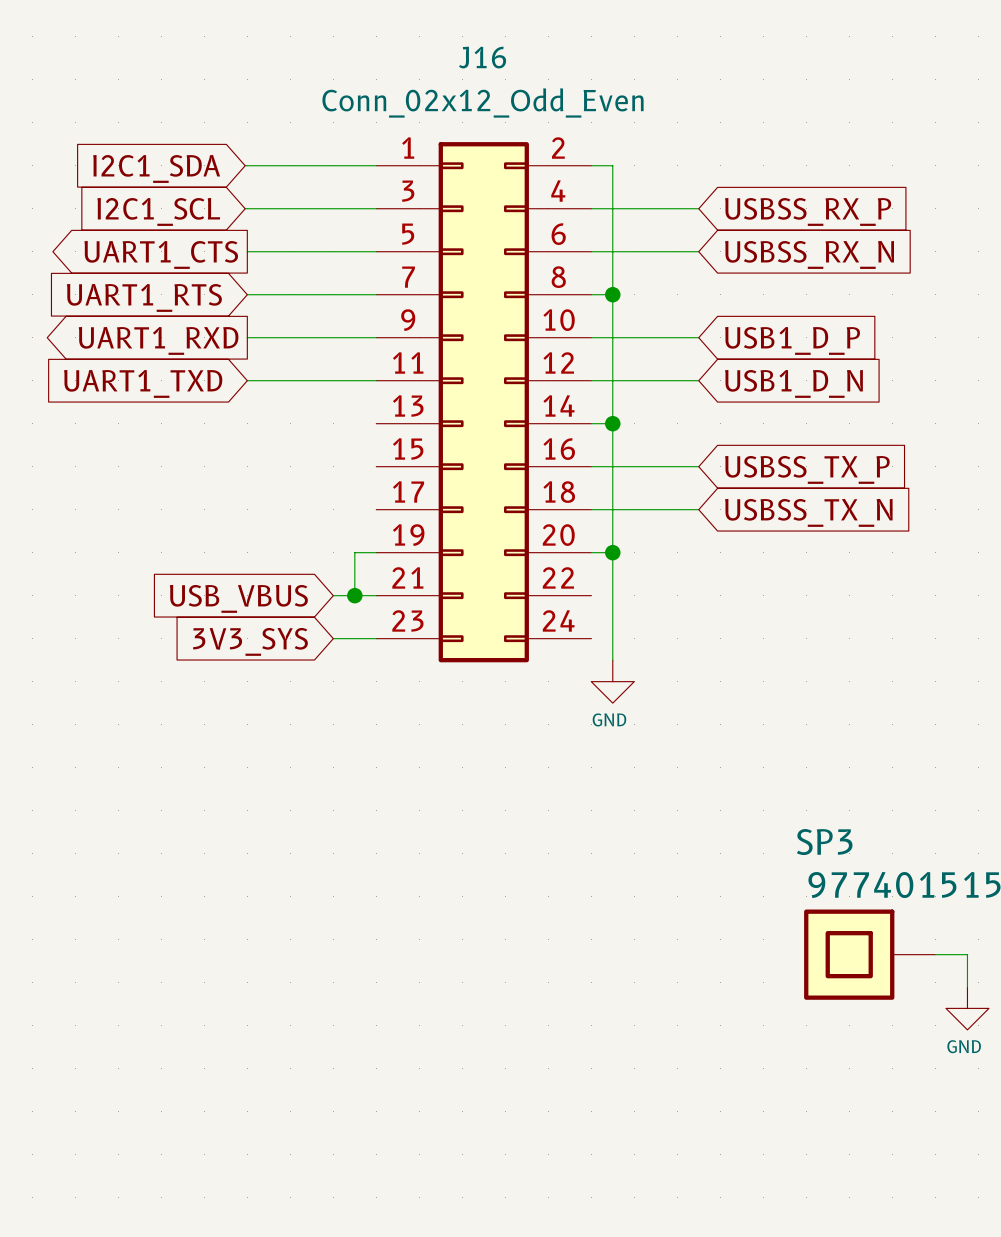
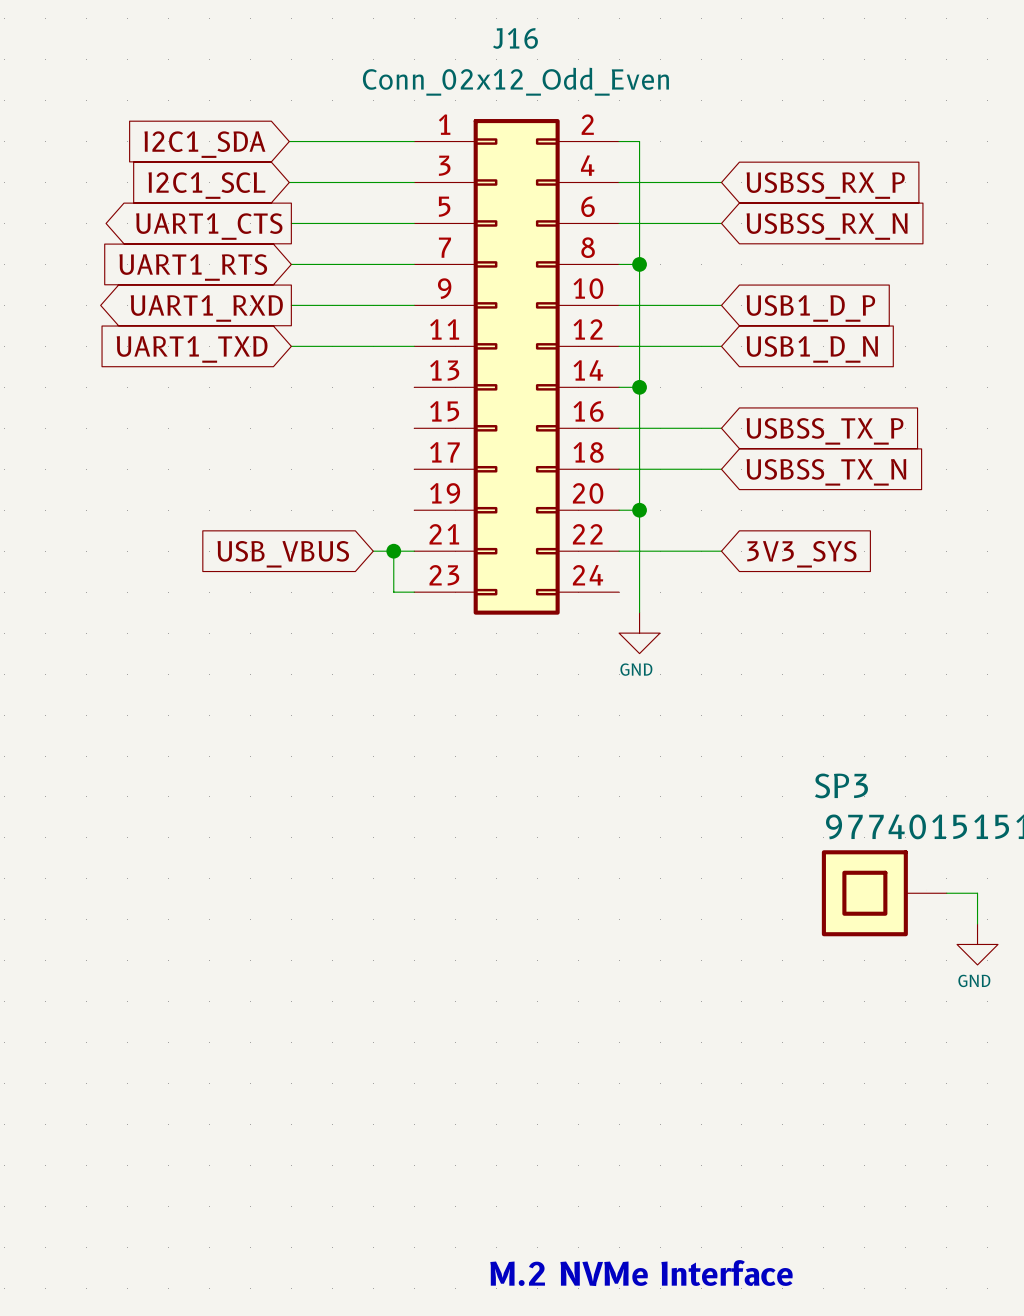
wire: (376, 552) (354, 552) (354, 595) -> none
wire: none -> (619, 551) (721, 551)
wire: (333, 638) (354, 638) -> (393, 551) (393, 592)
global label rotation: 0° (250, 641) -> 180° (801, 554)
global label position: 3V3_SYS (250, 641) -> 3V3_SYS (801, 554)

